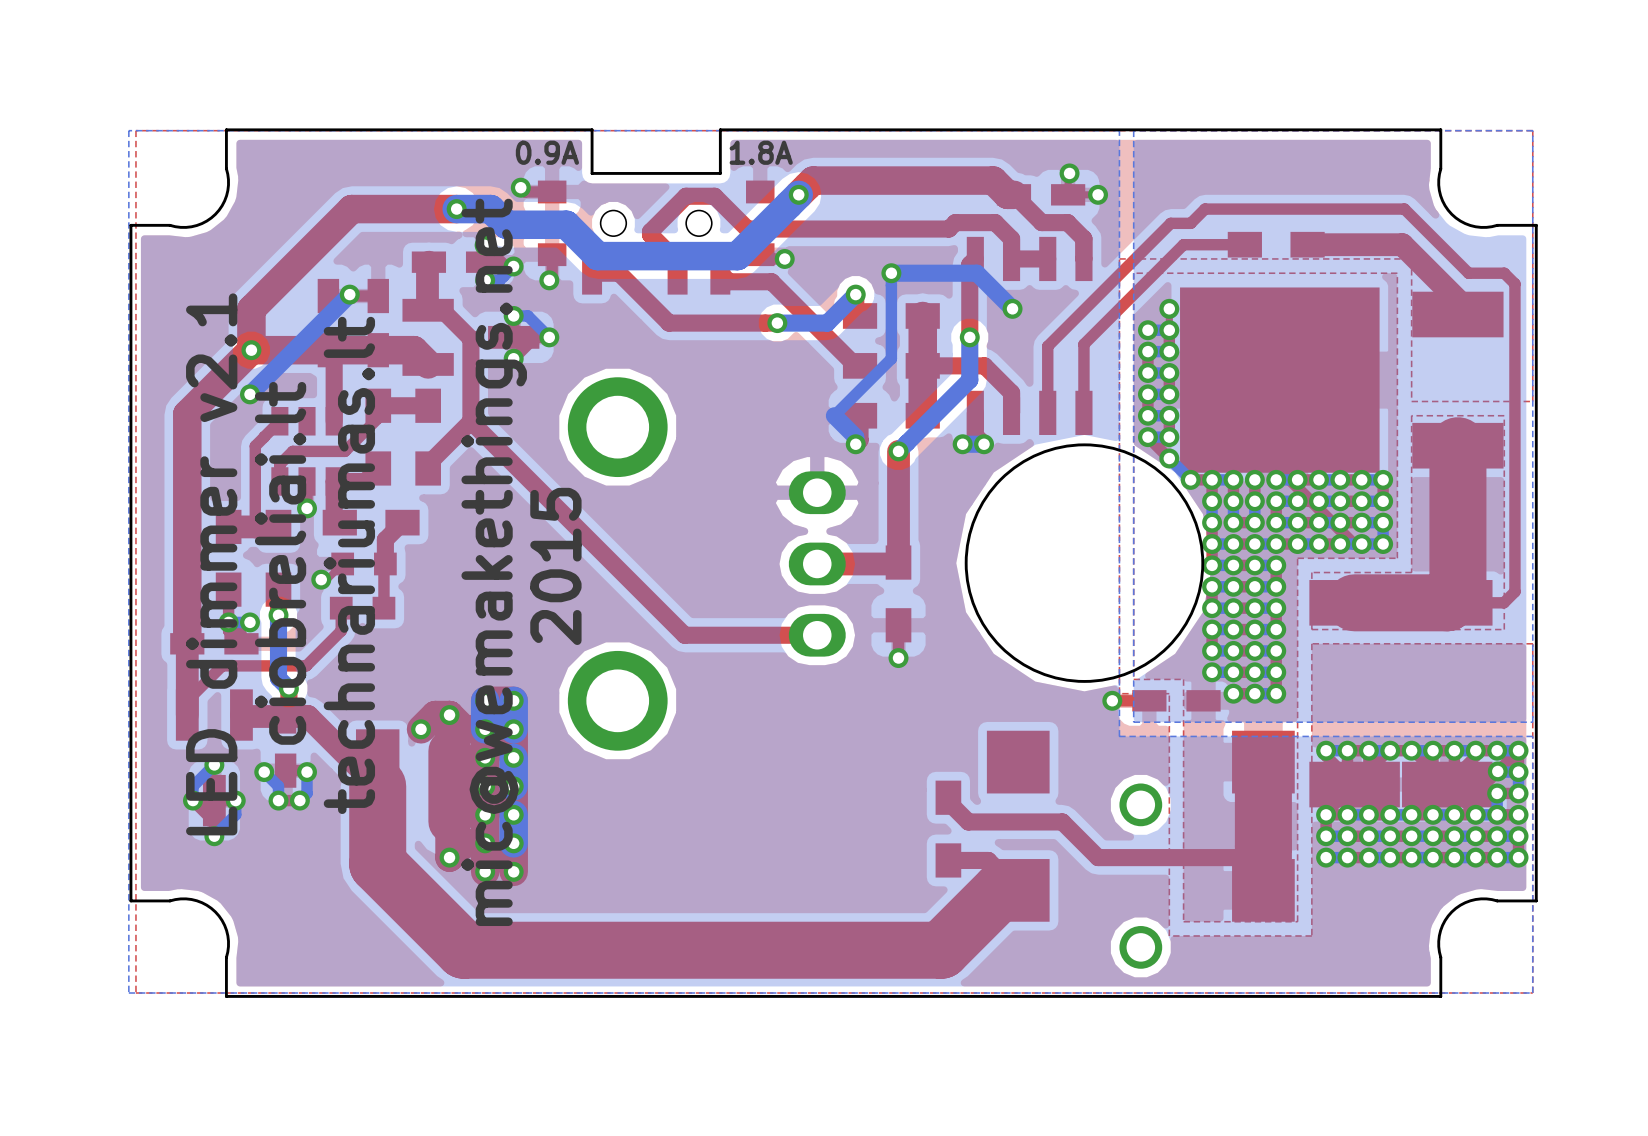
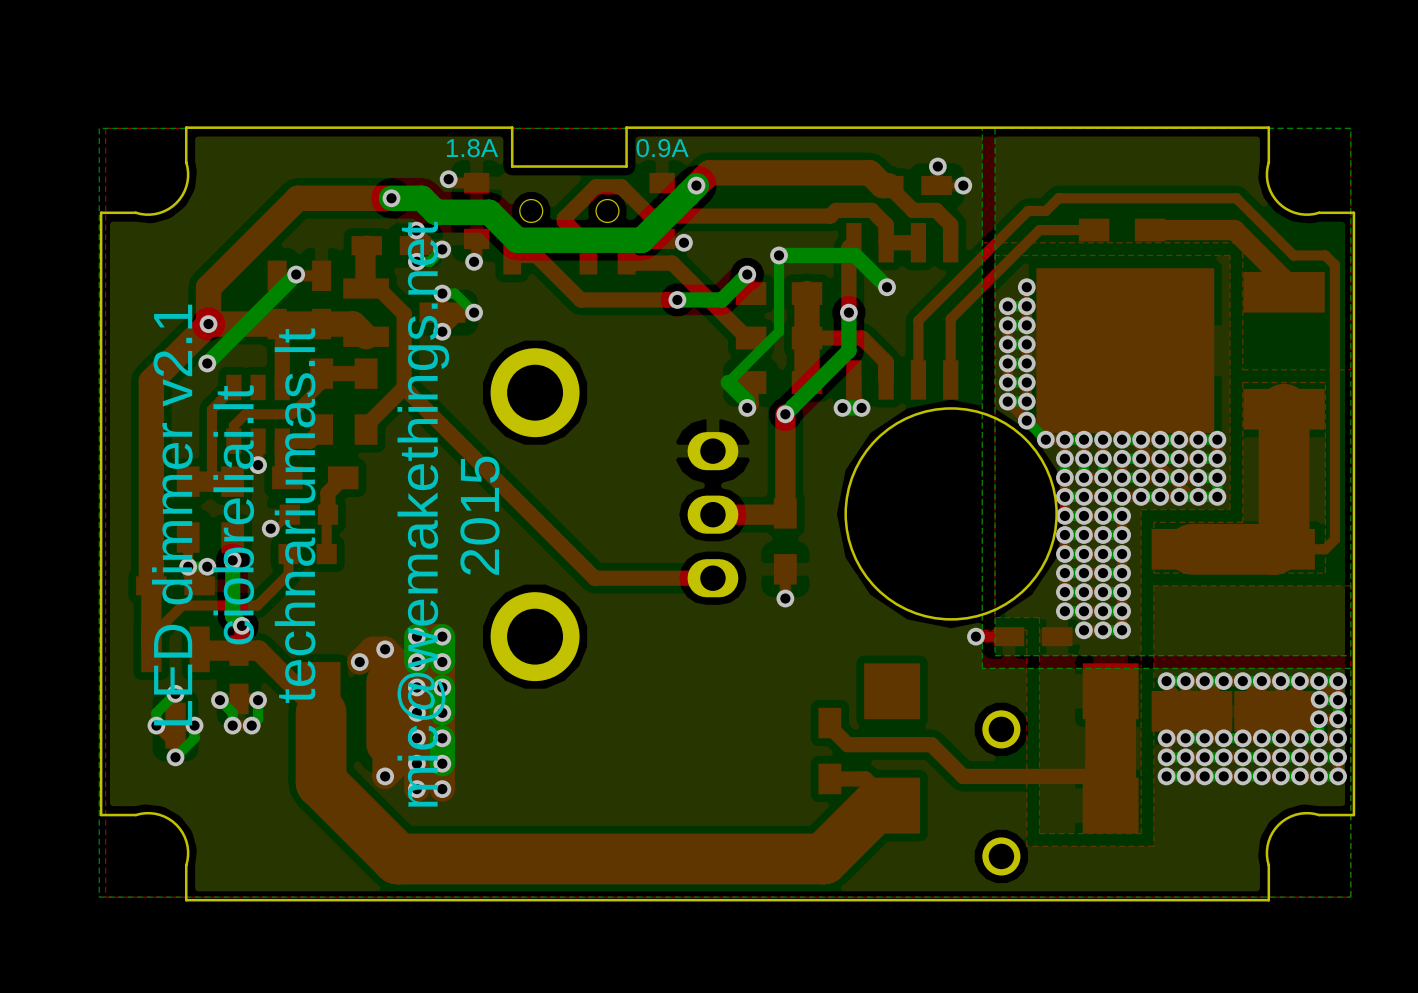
text: 0.9A (547, 152) -> 1.8A (472, 148)
text: 1.8A (761, 152) -> 0.9A (662, 148)

